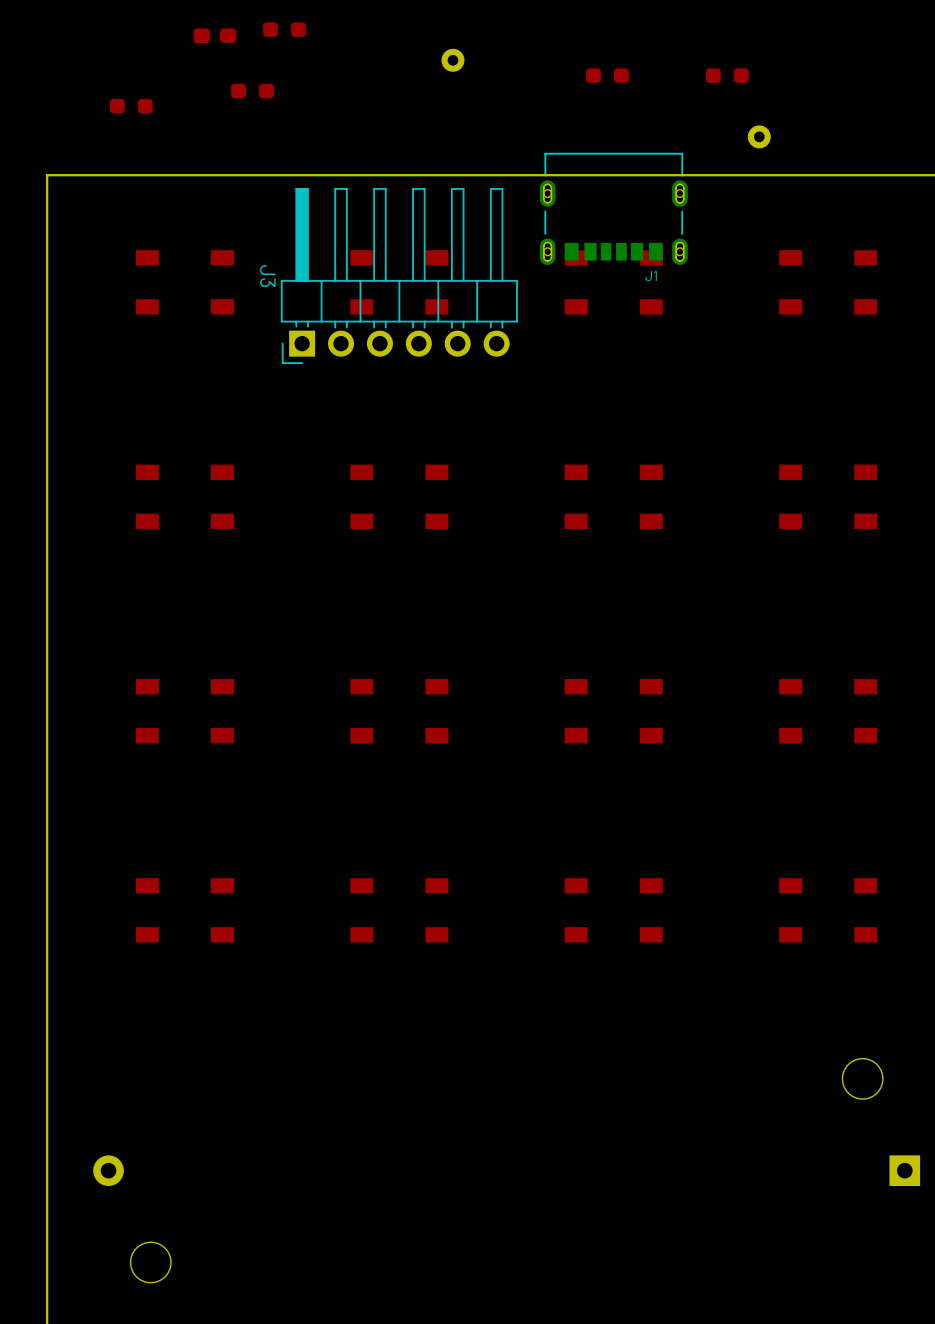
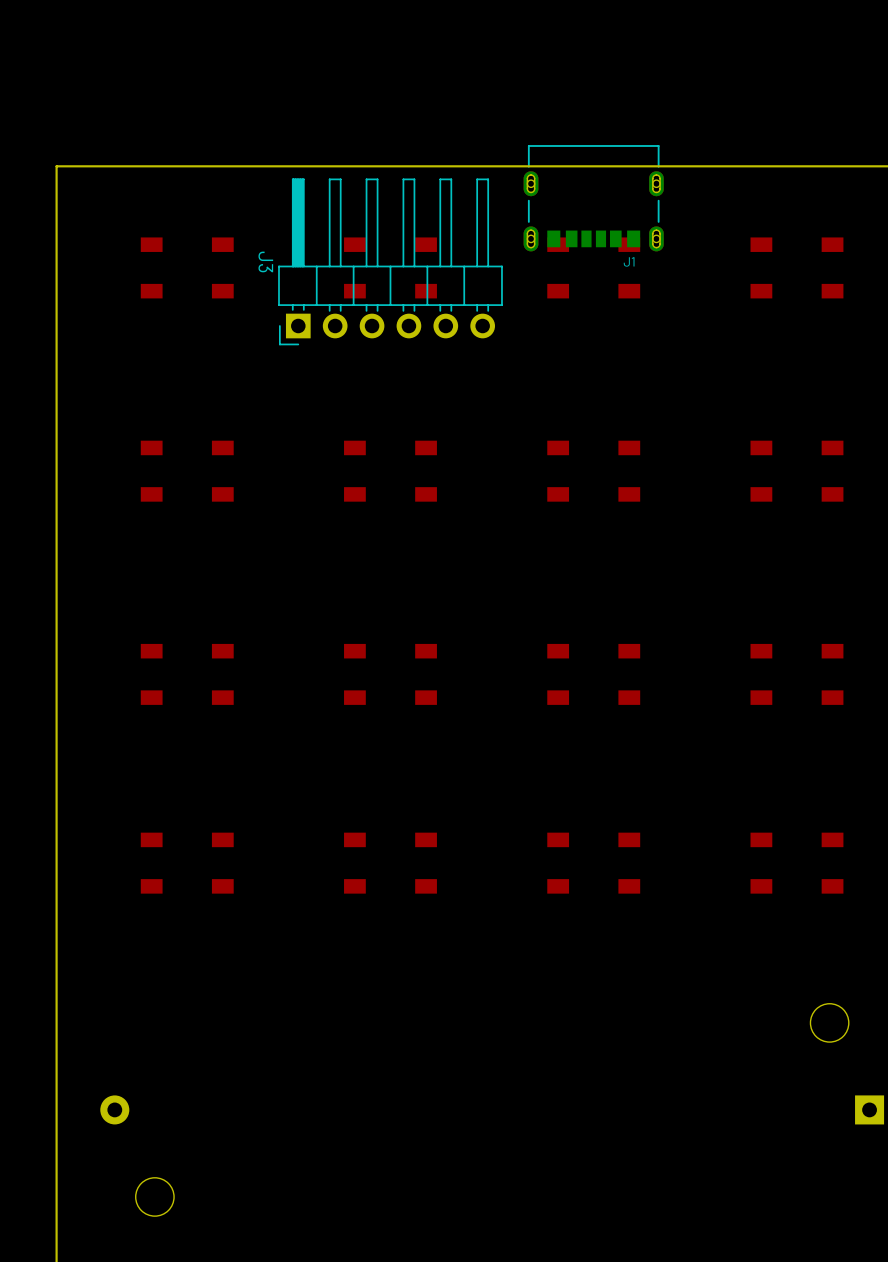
part: (284, 29) -> none
part: (214, 35) -> none
part: (452, 60) -> none
part: (607, 75) -> none
part: (727, 75) -> none
part: (252, 90) -> none
part: (131, 106) -> none
part: (759, 136) -> none

